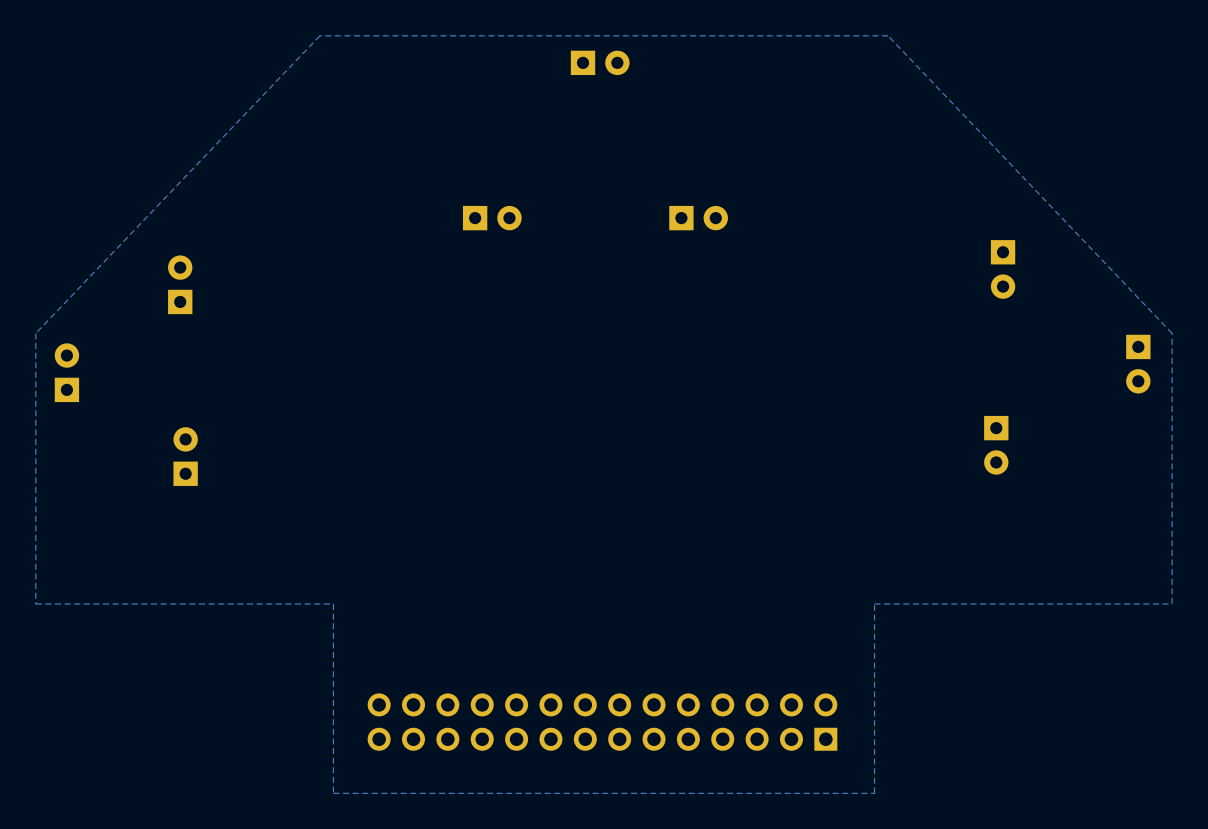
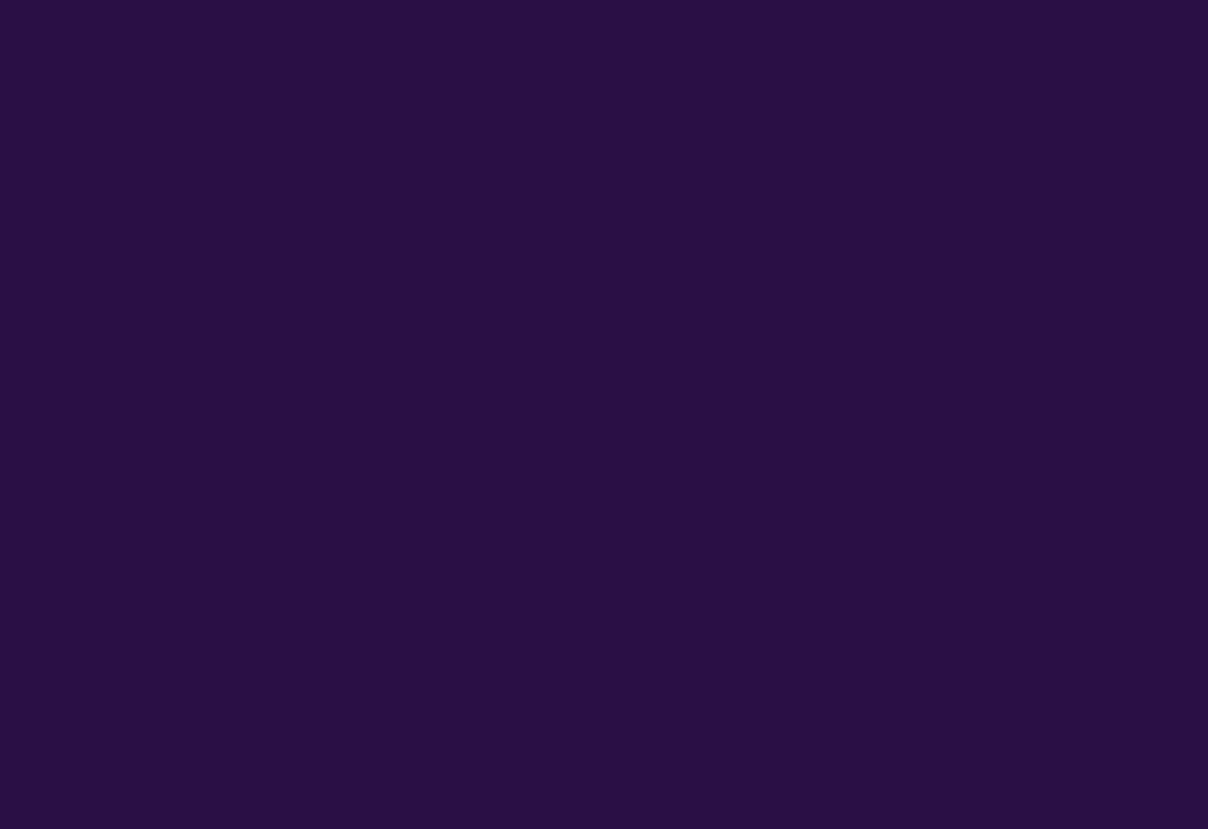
zone outline: (888, 35) (1172, 333) (1172, 603) (874, 603) (874, 793) (333, 793) (333, 603) (35, 603) (35, 333) (319, 35) (888, 35) -> none
part: (600, 62) -> none
part: (492, 218) -> none
part: (698, 218) -> none
part: (1003, 269) -> none
part: (180, 284) -> none
part: (1138, 364) -> none
part: (66, 372) -> none
part: (996, 445) -> none
part: (185, 456) -> none
part: (602, 722) -> none

